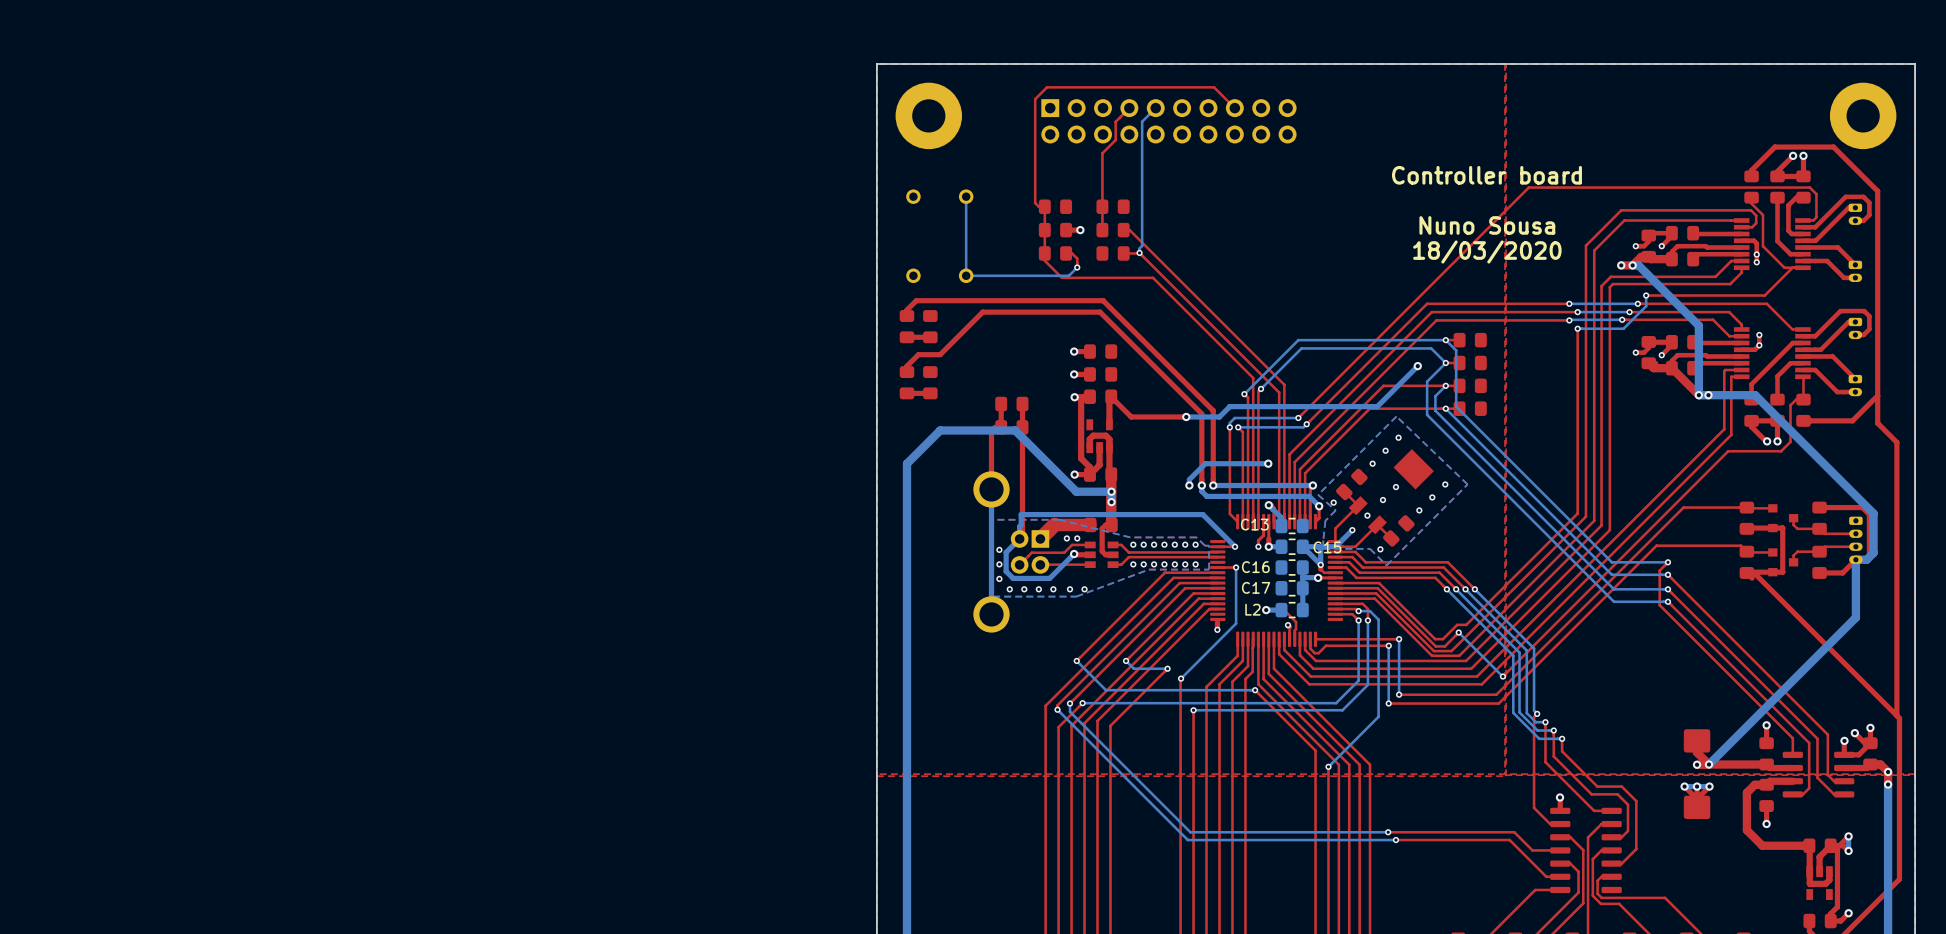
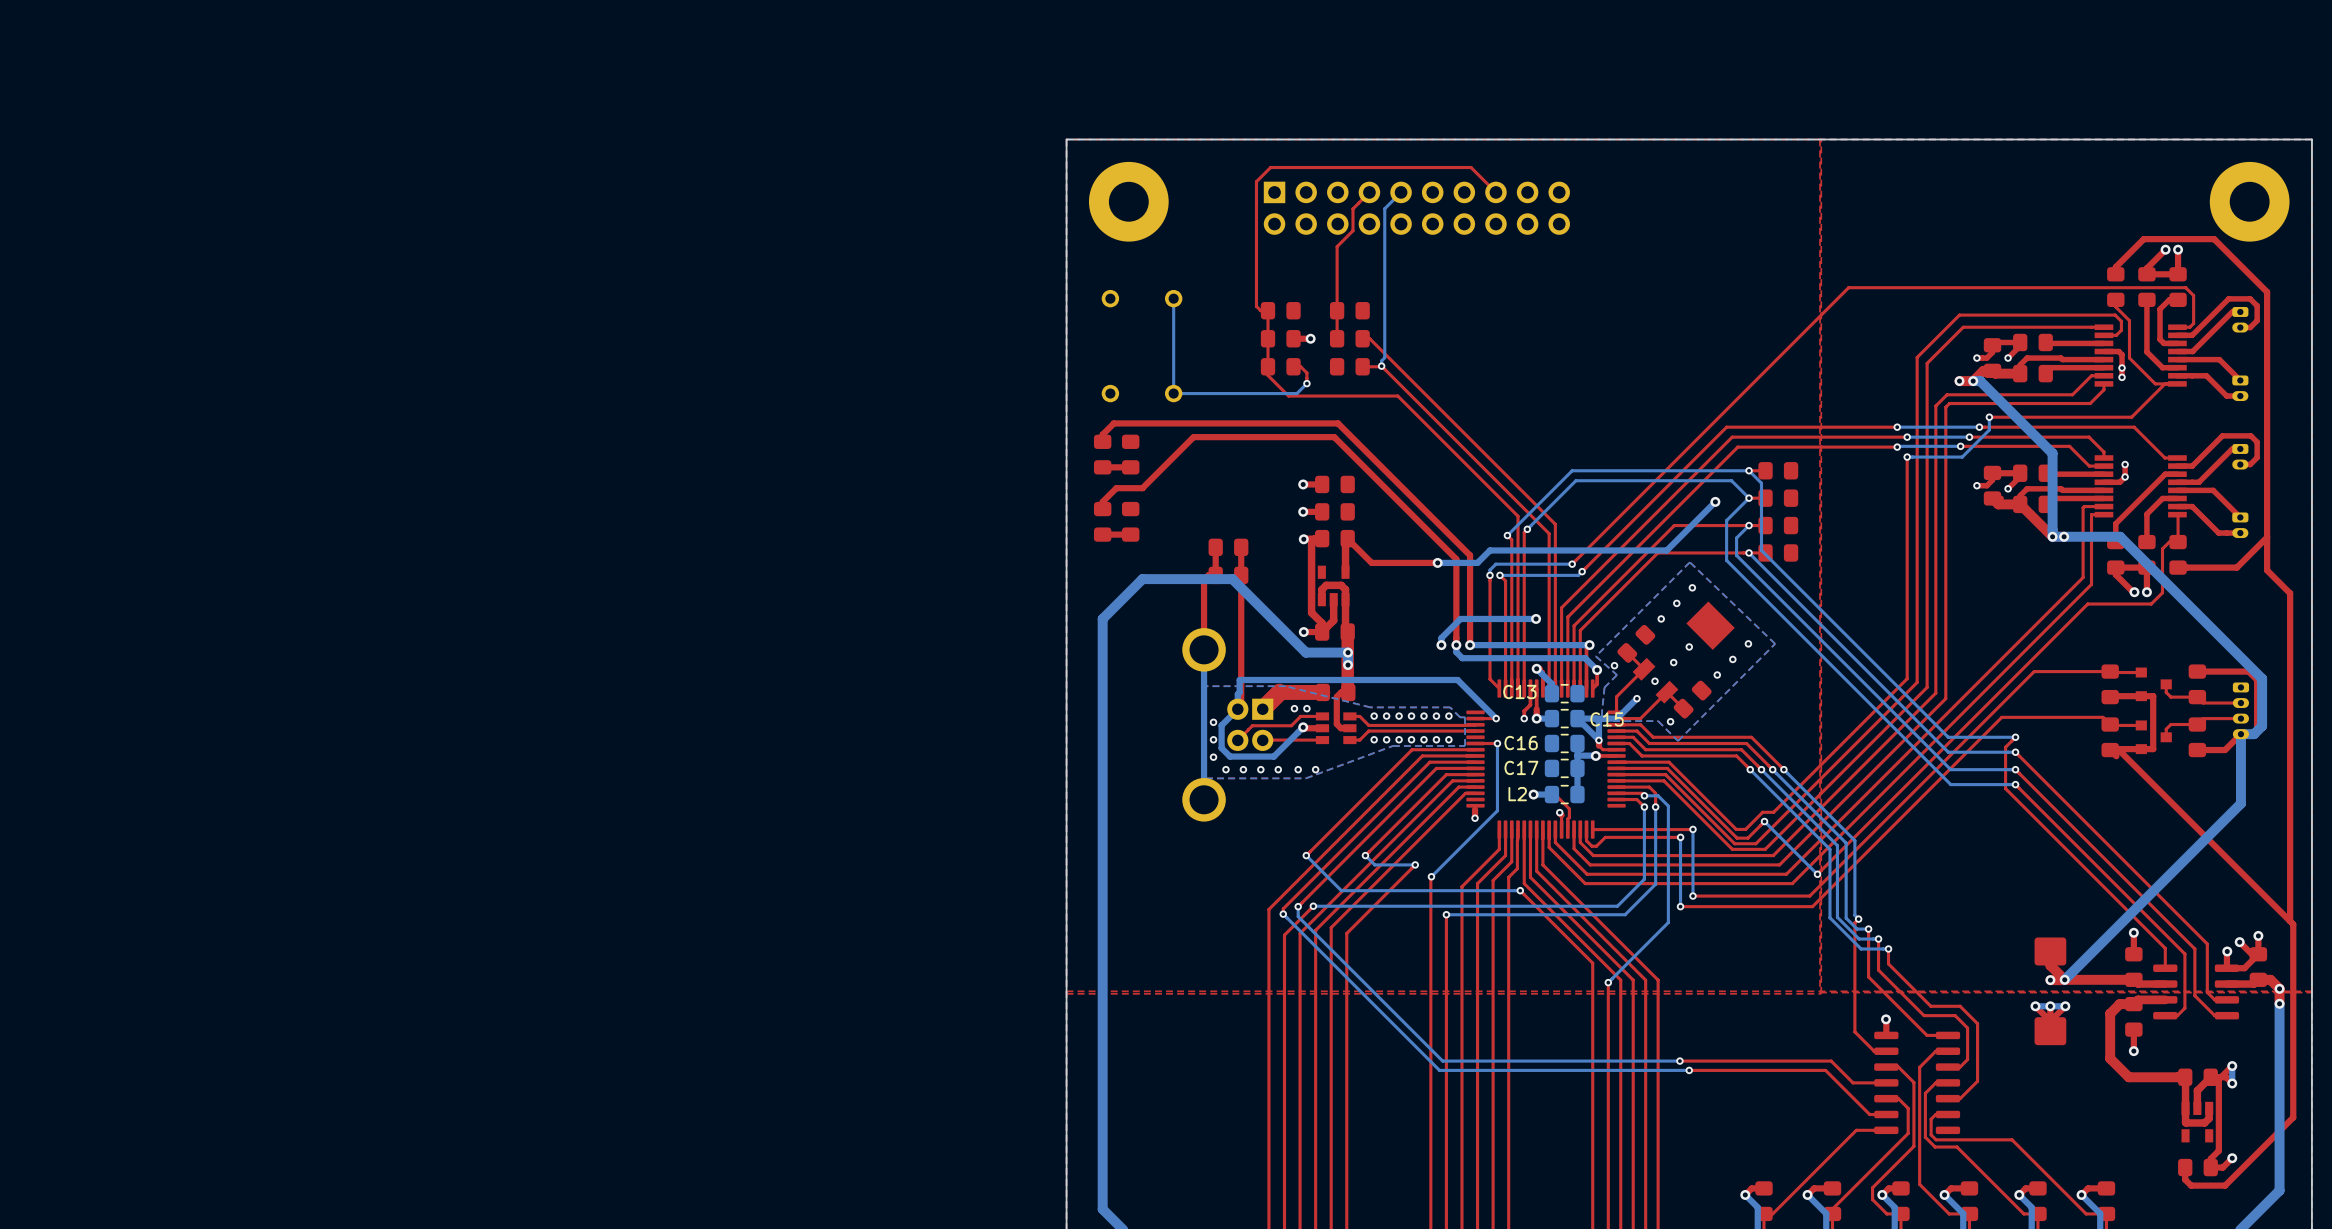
text: Controller board (1486, 175) -> none
text: Nuno Sousa (1487, 225) -> none
text: 18/03/2020 (1487, 252) -> none

